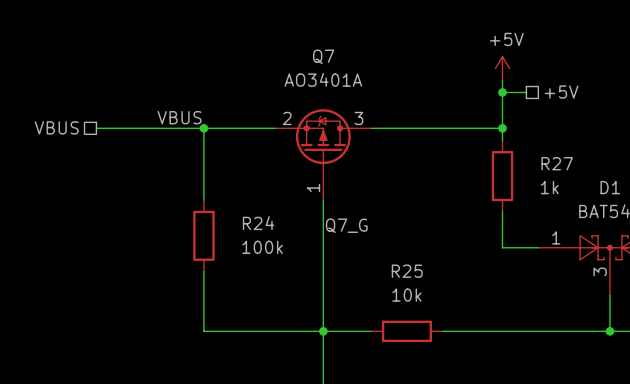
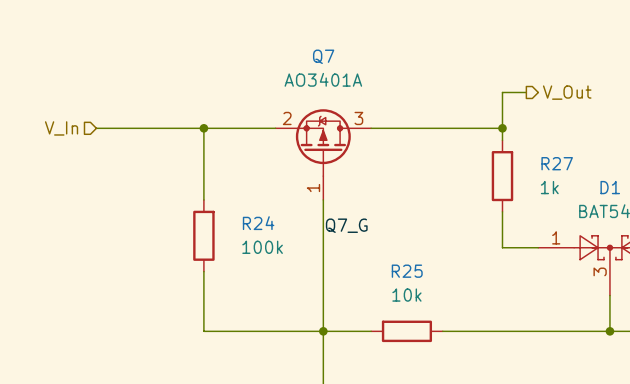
power symbol: +5V (502, 68) -> none
wire: (502, 80) (502, 92) -> none
junction: (502, 92) -> none
hierarchical label shape: passive (561, 92) -> output (567, 92)
hierarchical label: +5V (561, 92) -> V_Out (567, 92)
label: VBUS (179, 117) -> none
hierarchical label shape: passive (56, 127) -> input (61, 128)
hierarchical label: VBUS (56, 127) -> V_In (61, 128)

